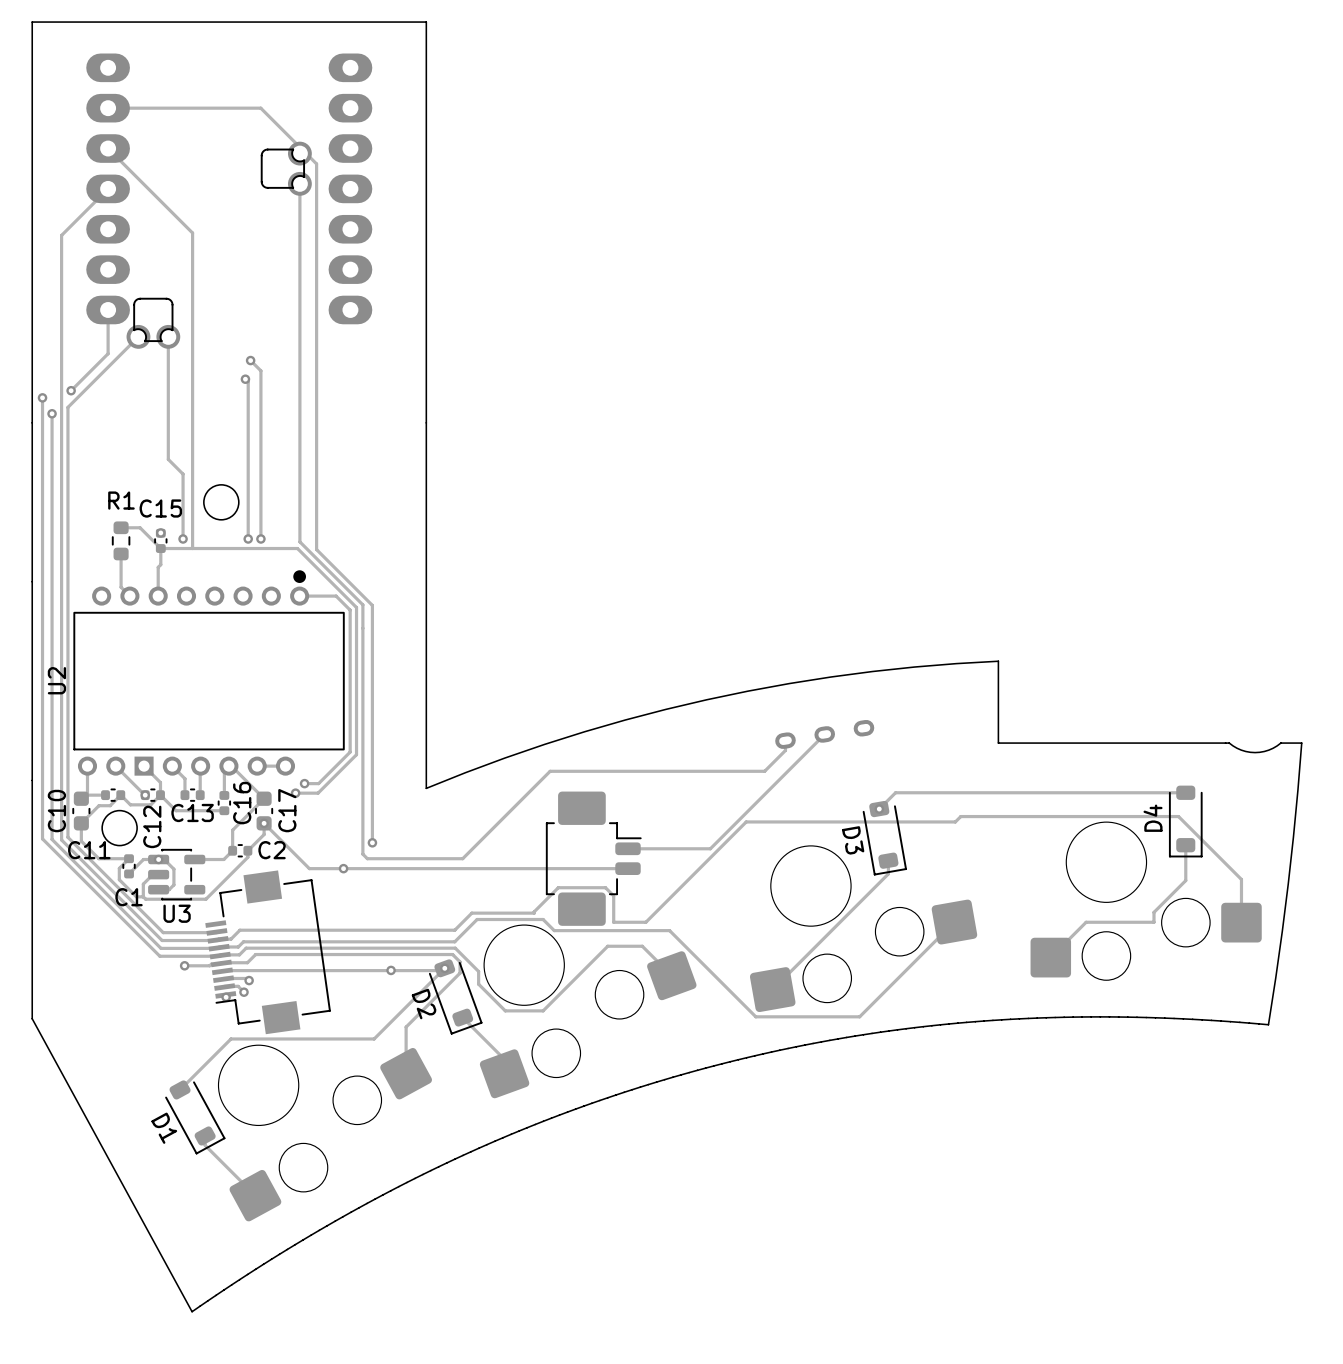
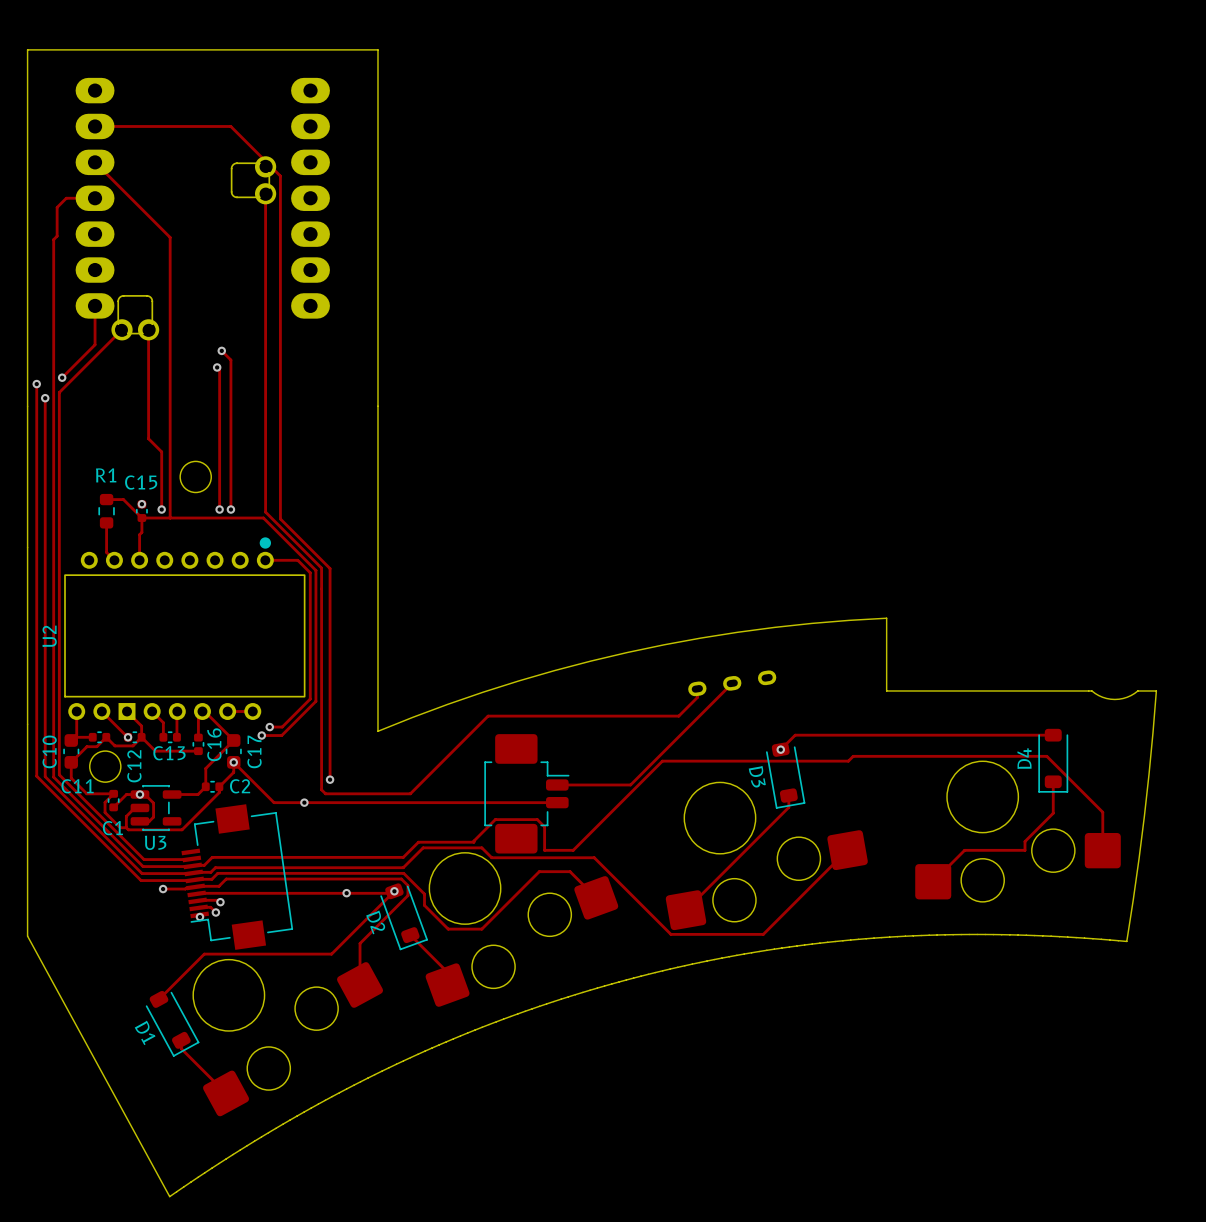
track: (108, 188) (65, 231) -> (95, 198) (66, 198) (57, 207) (57, 236)

